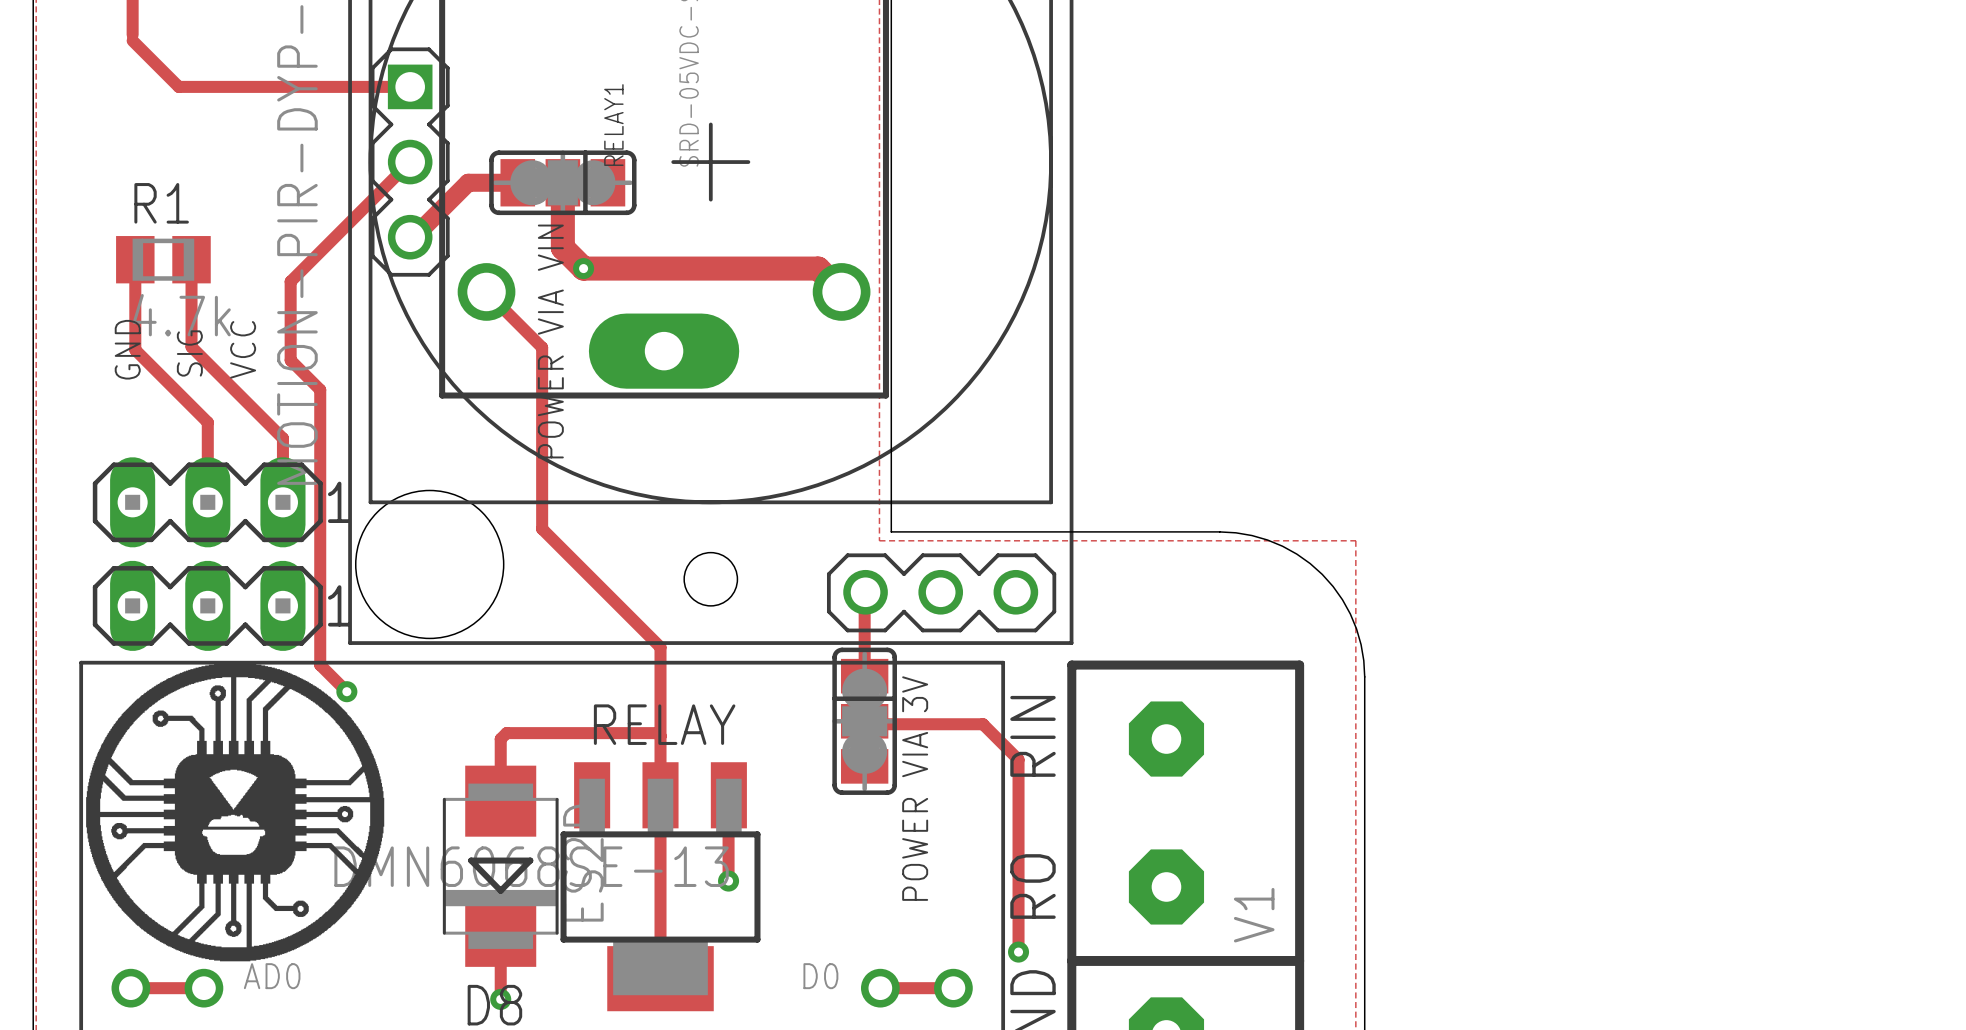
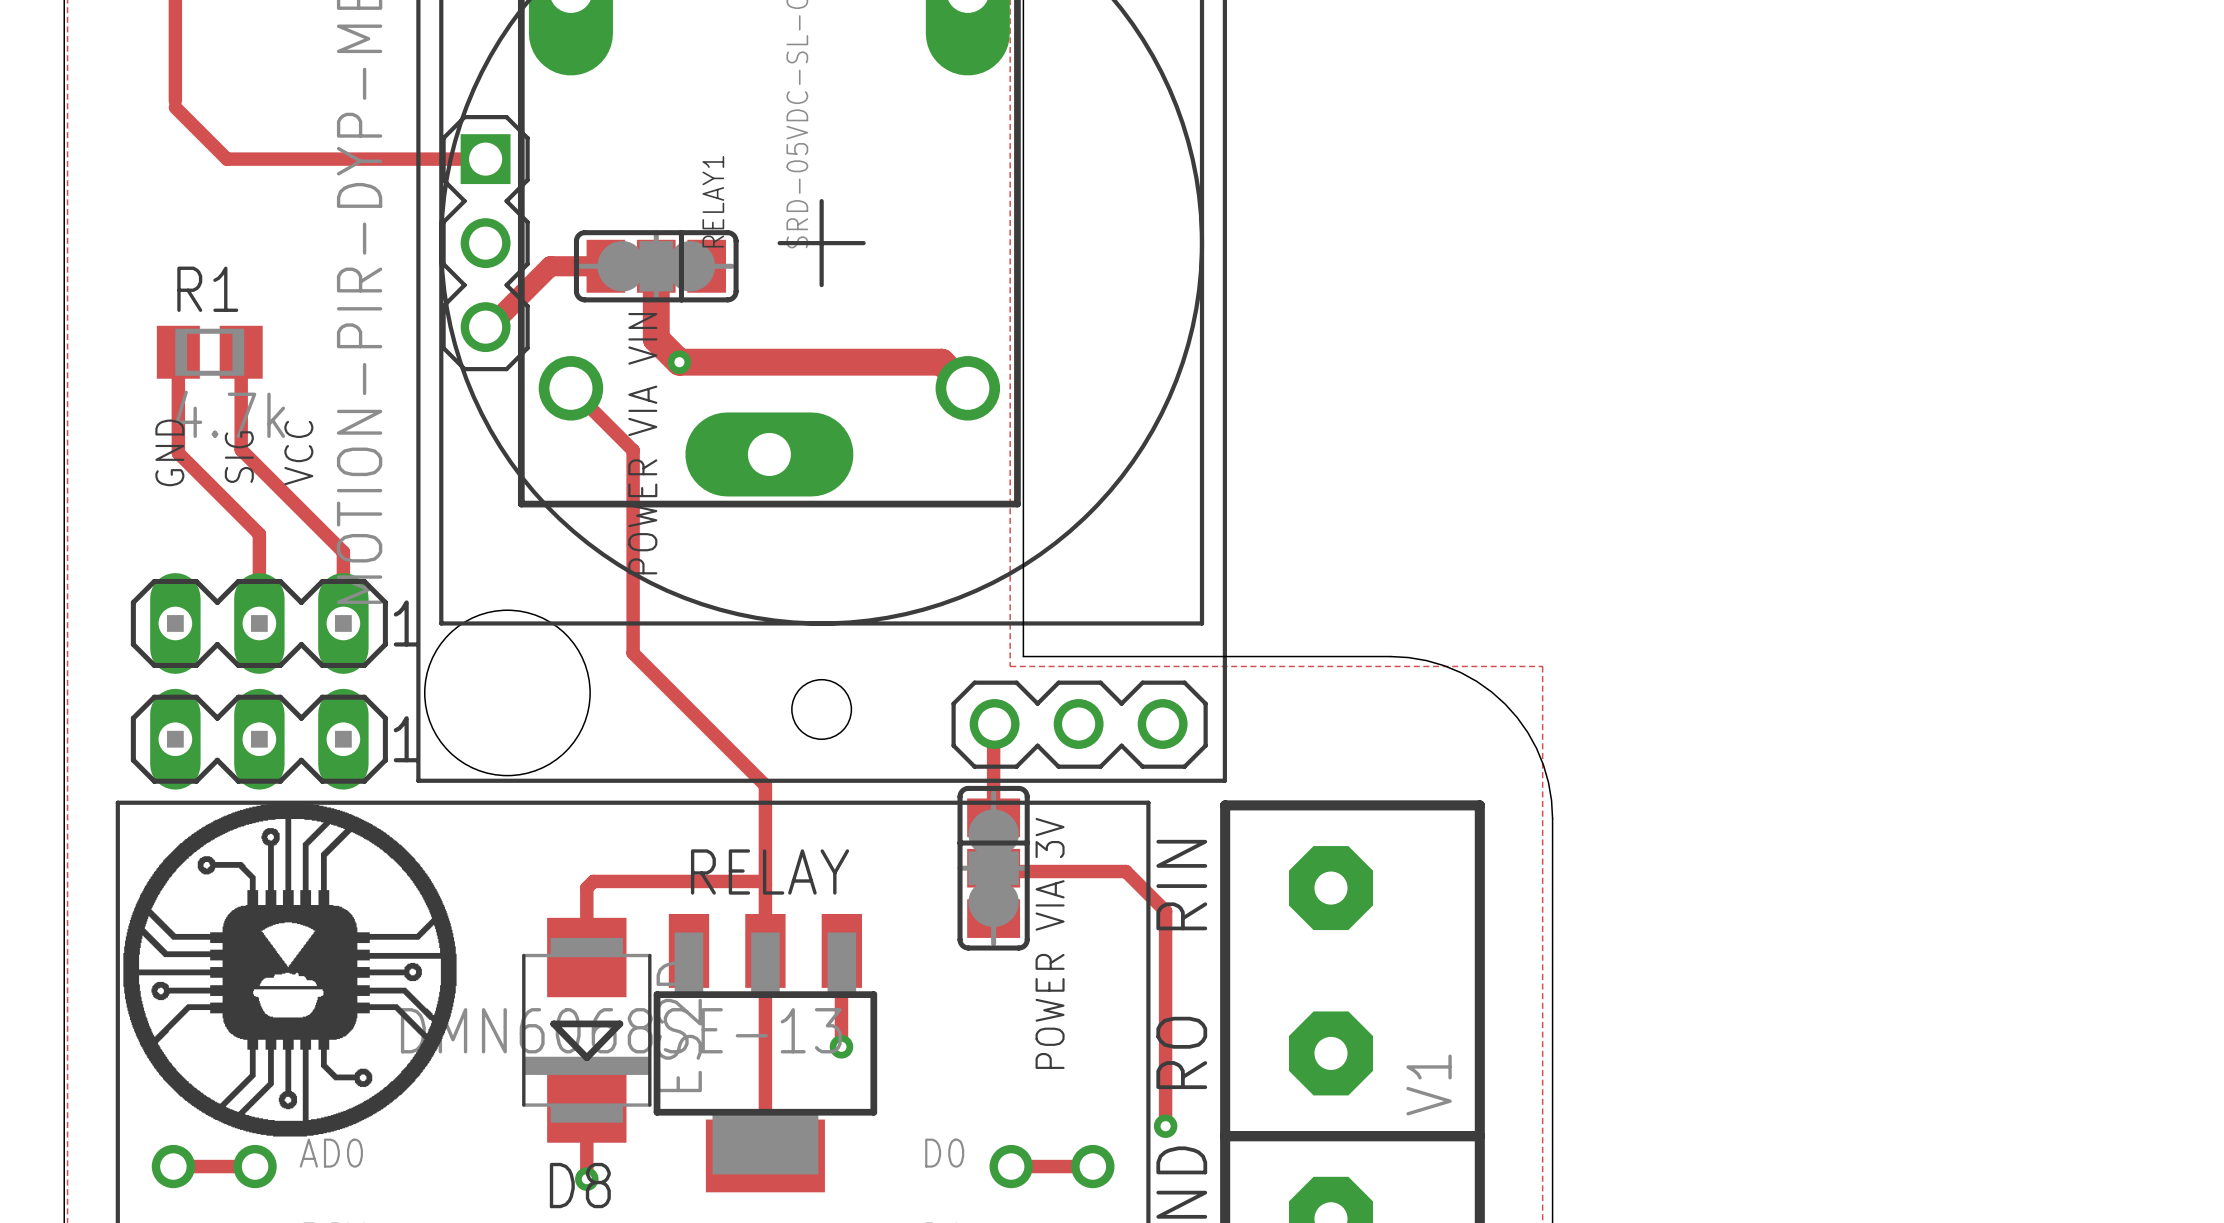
track: (410, 162) (290, 281) (290, 360) (320, 389) (320, 665) (346, 691) -> none
via: (346, 691) -> none

